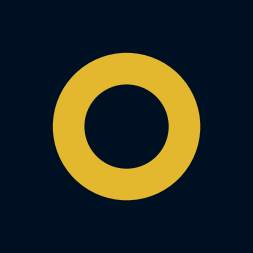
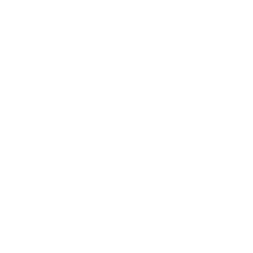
part: (126, 126) -> none

